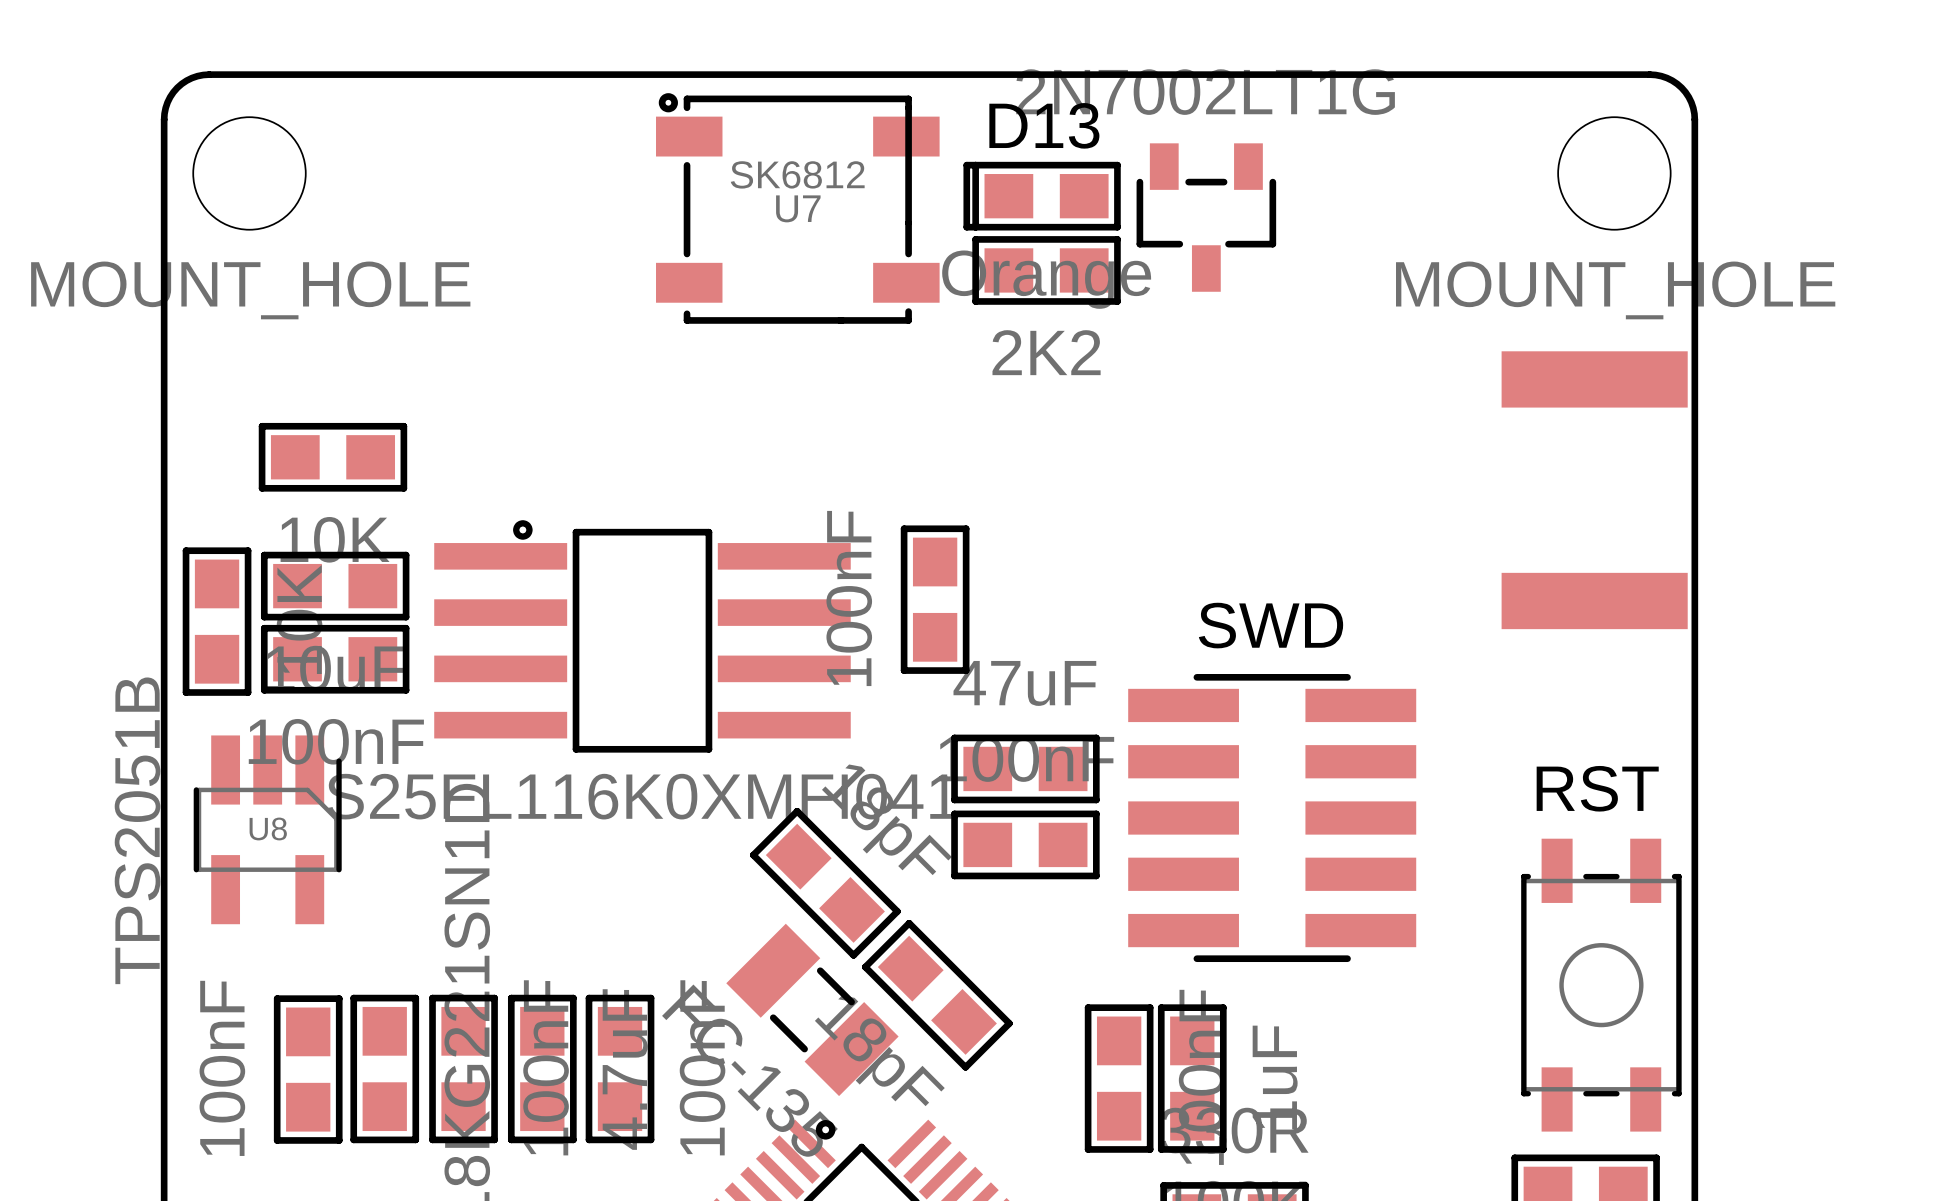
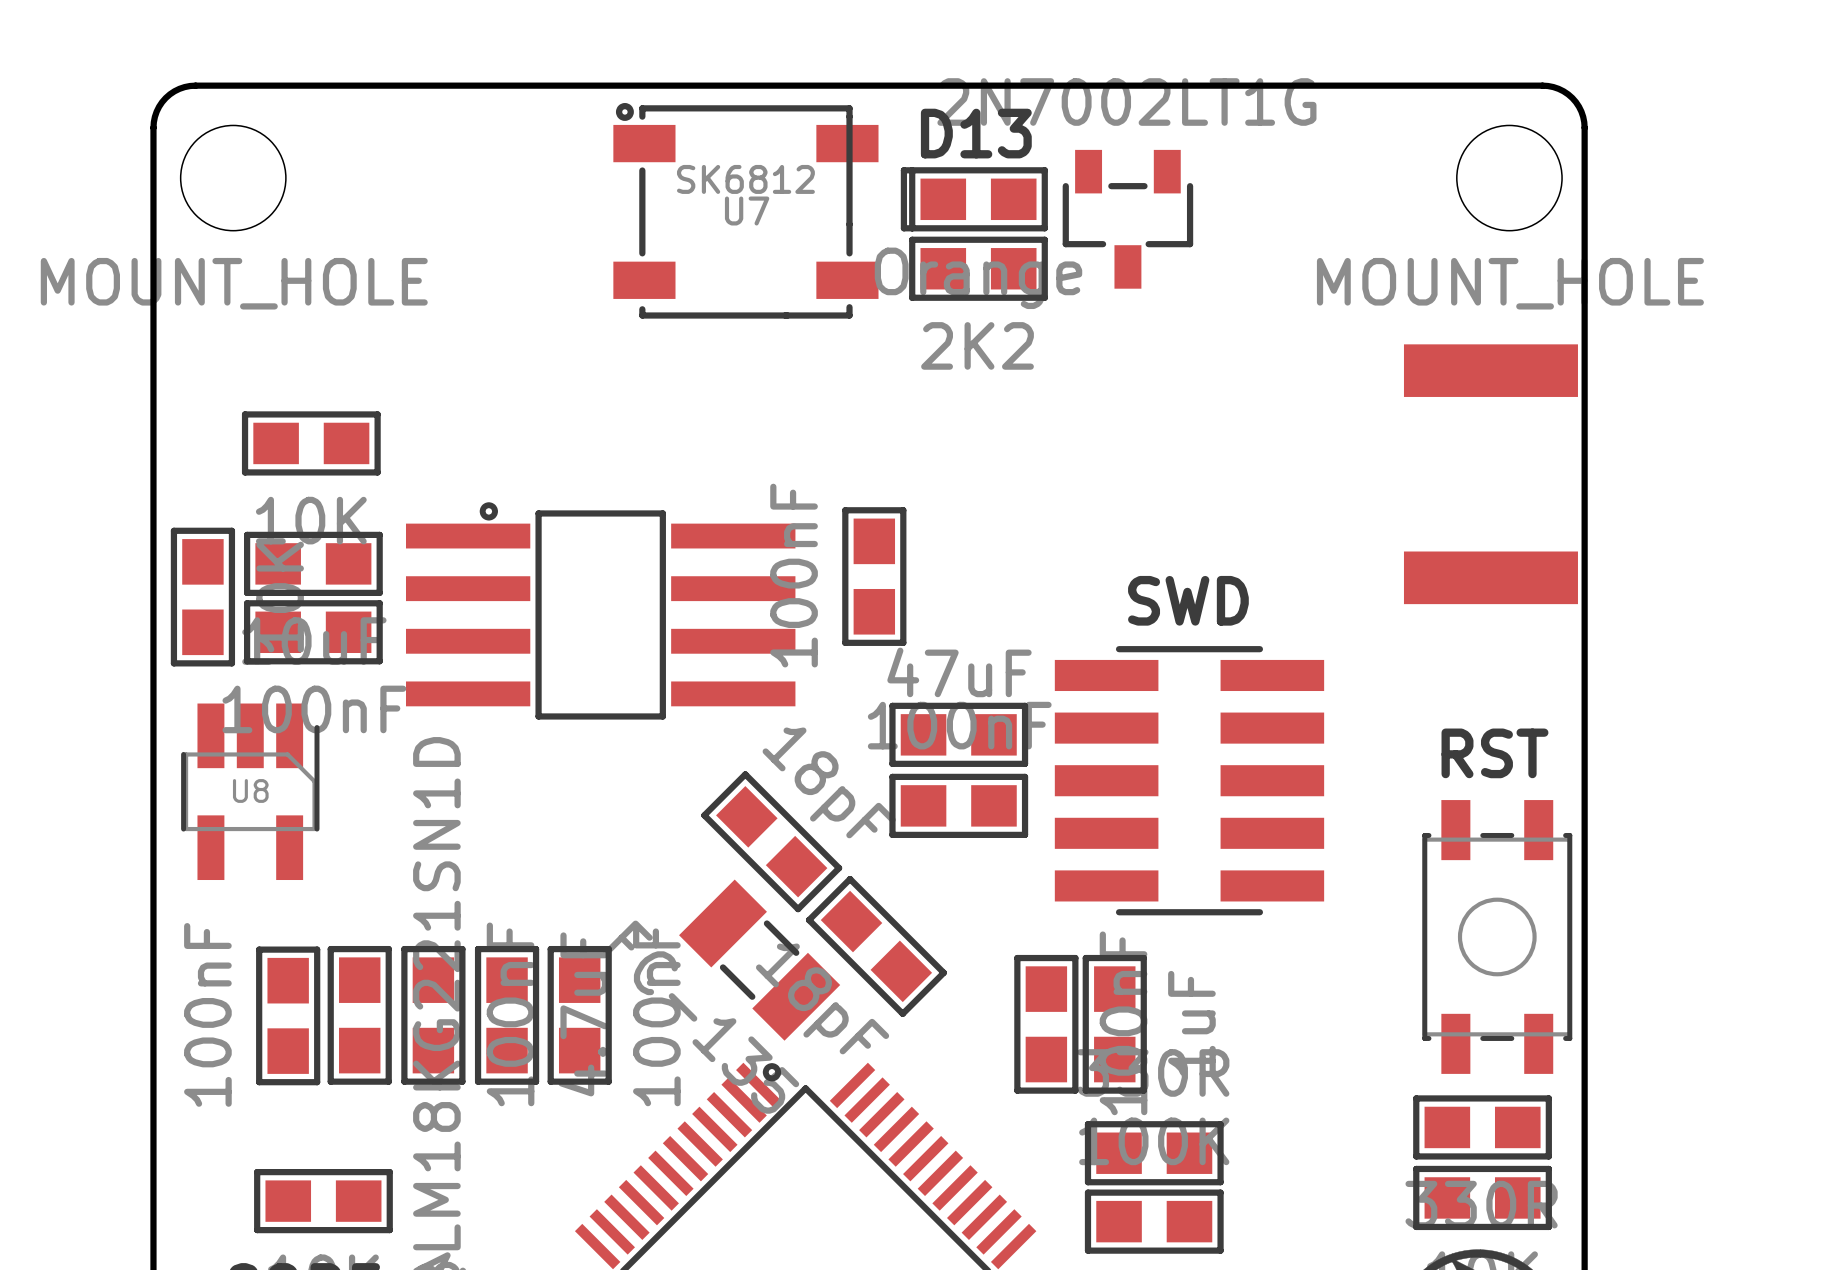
part value position: 47uF (1024, 683) -> 47uF (959, 672)
part value: S25FL116K0XMFI041 (642, 796) -> none
U8 value: TPS2051B (137, 830) -> none

